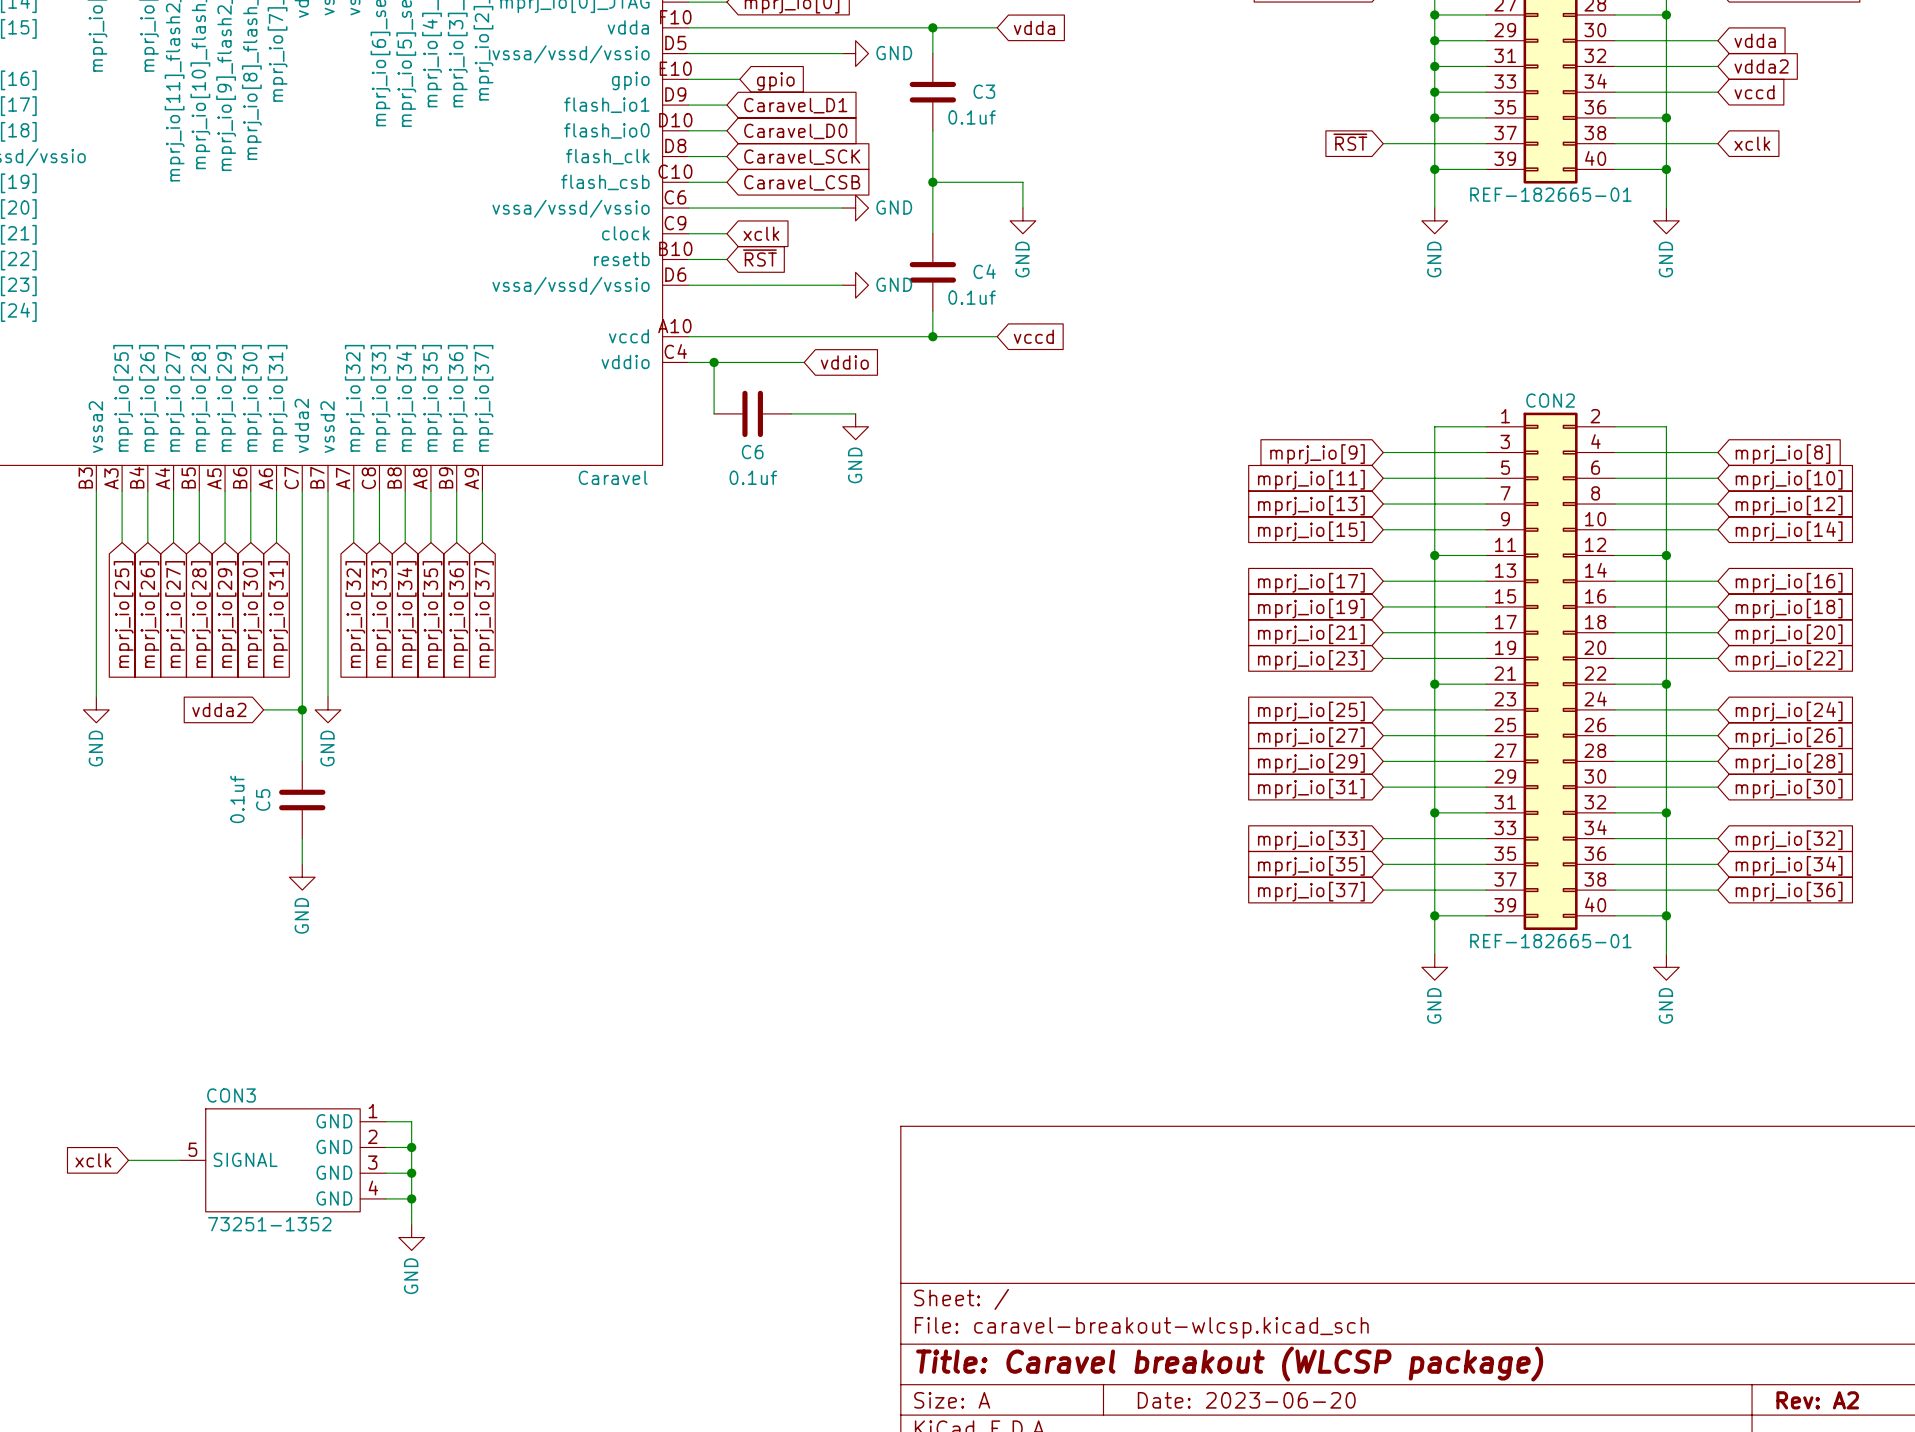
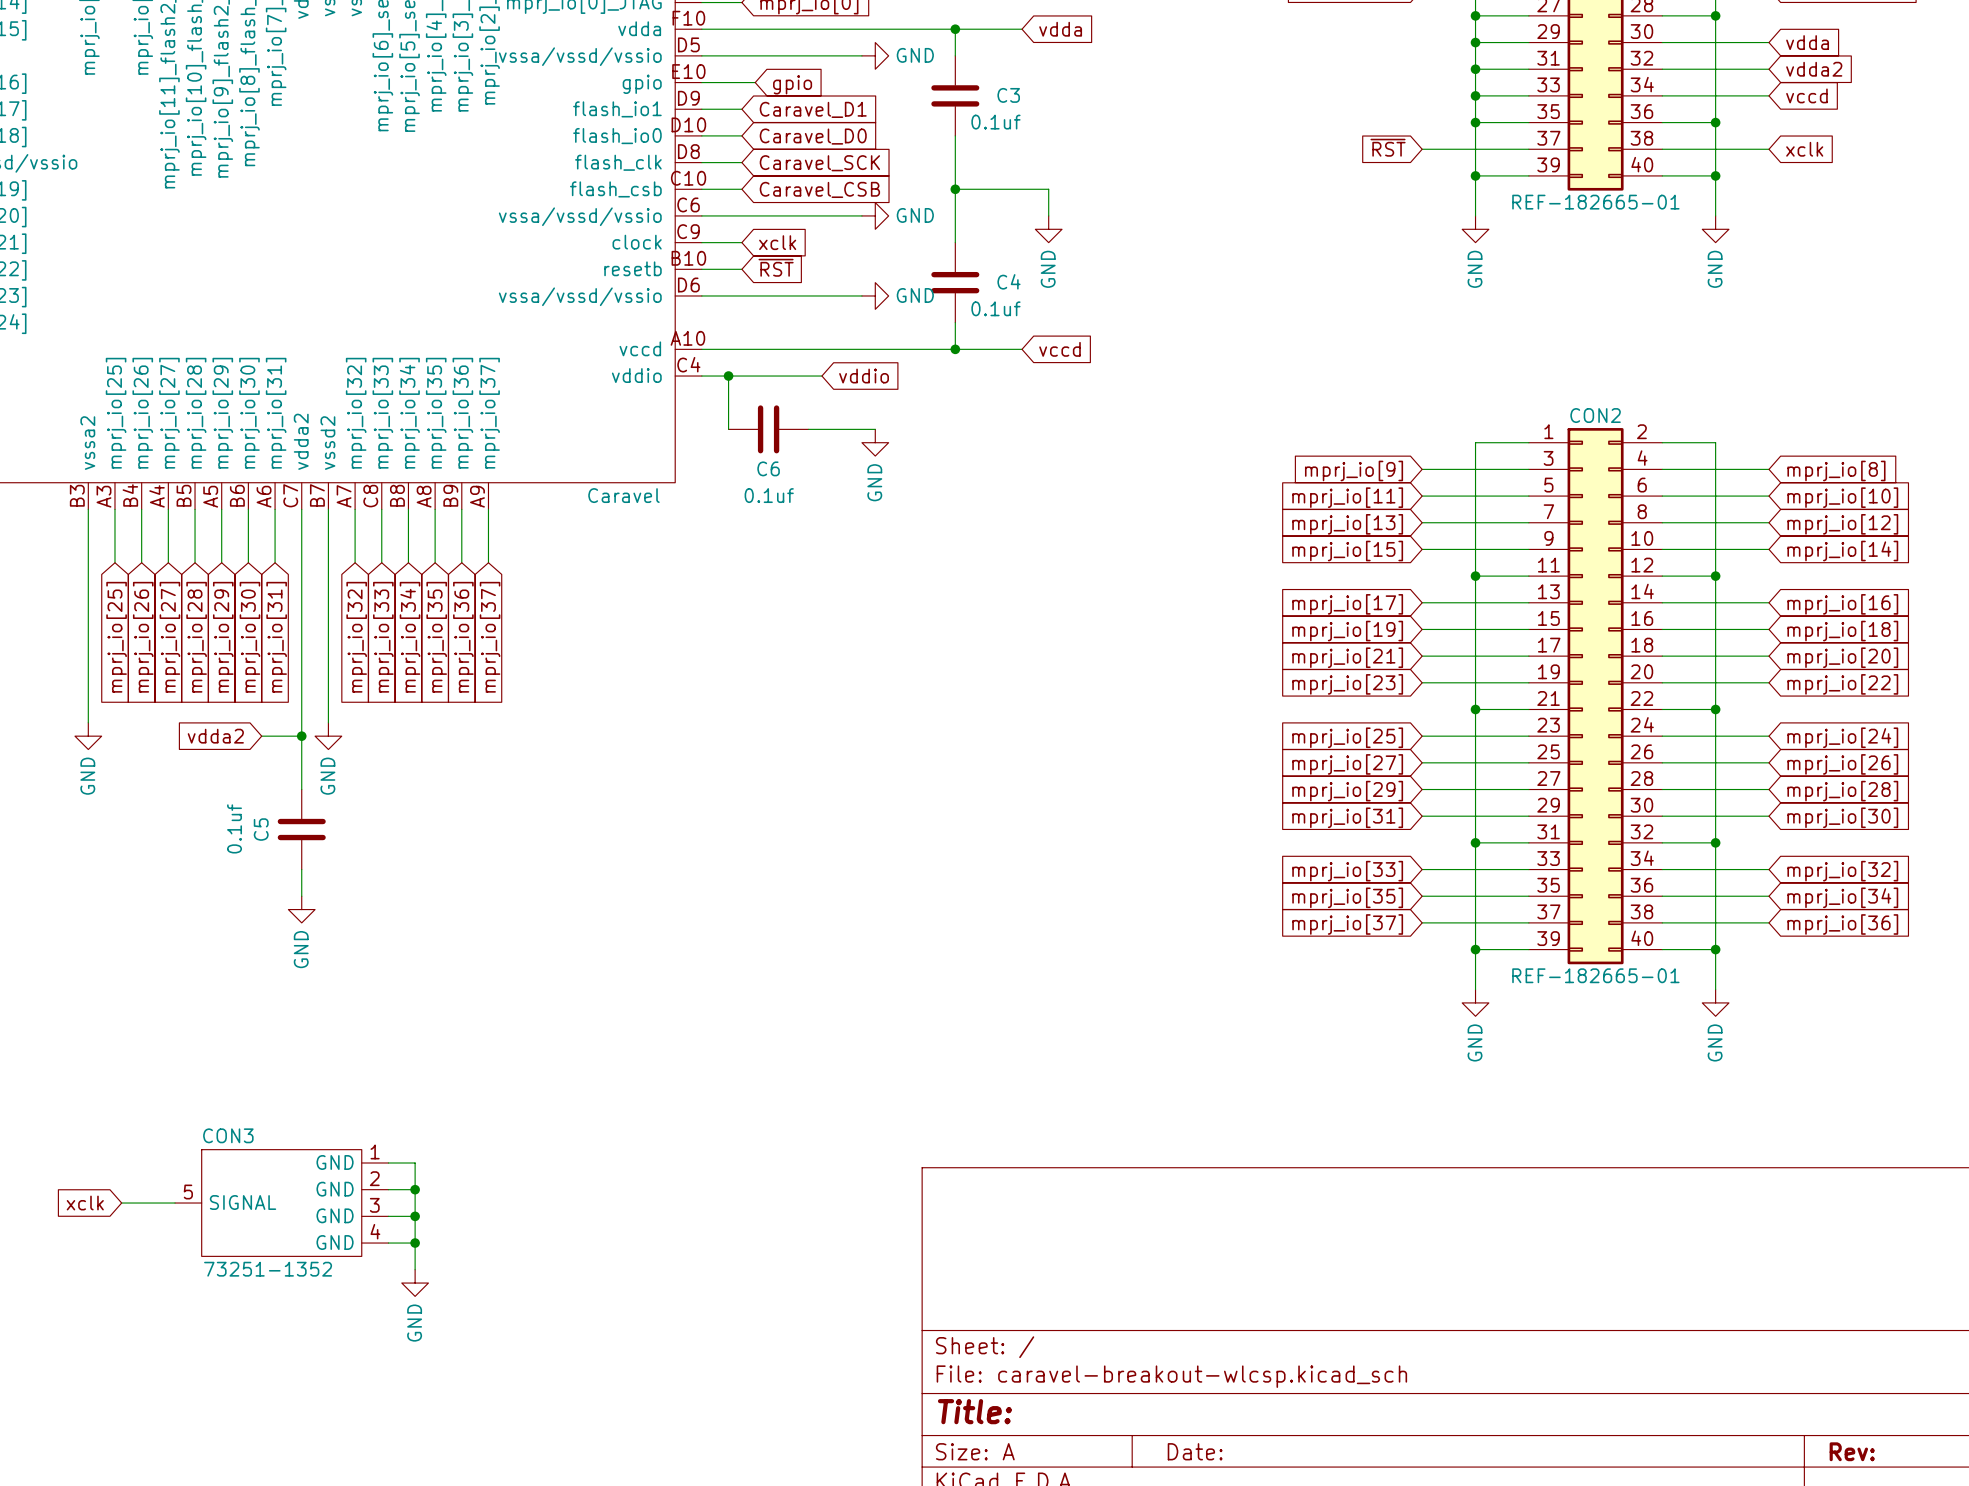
title block: Title: Caravel breakout (WLCSP package) (1229, 1364) -> Title: (974, 1411)
title block: Date: 2023-06-20 (1246, 1400) -> Date: (1195, 1451)
title block: Rev: A2 (1817, 1400) -> Rev: (1852, 1451)

